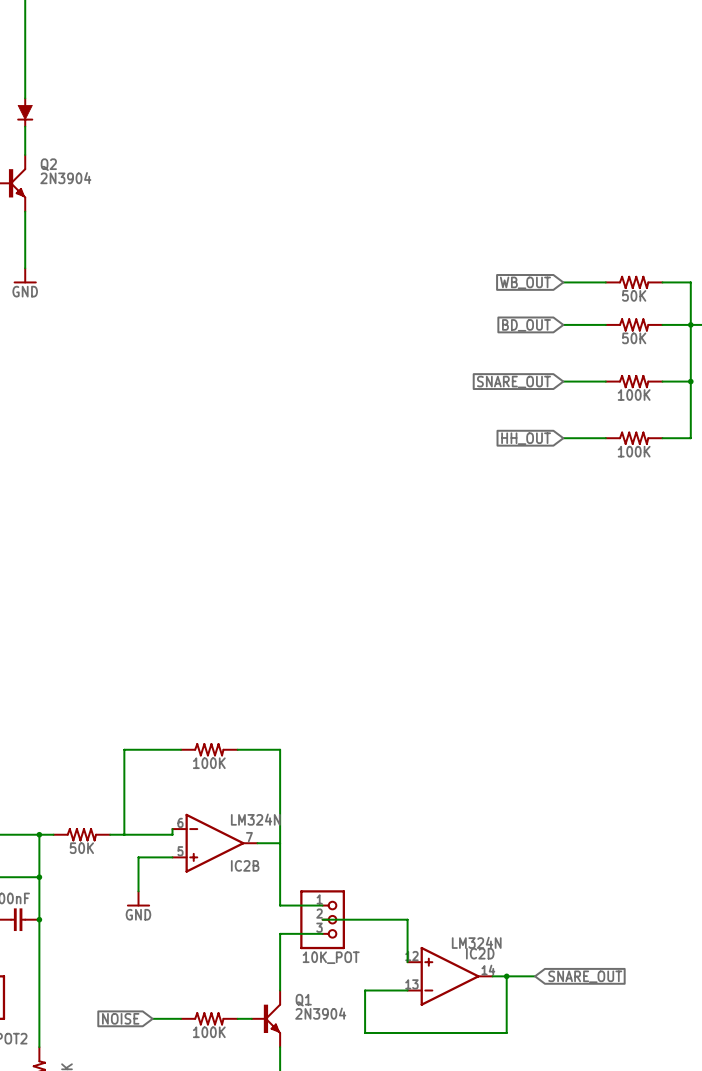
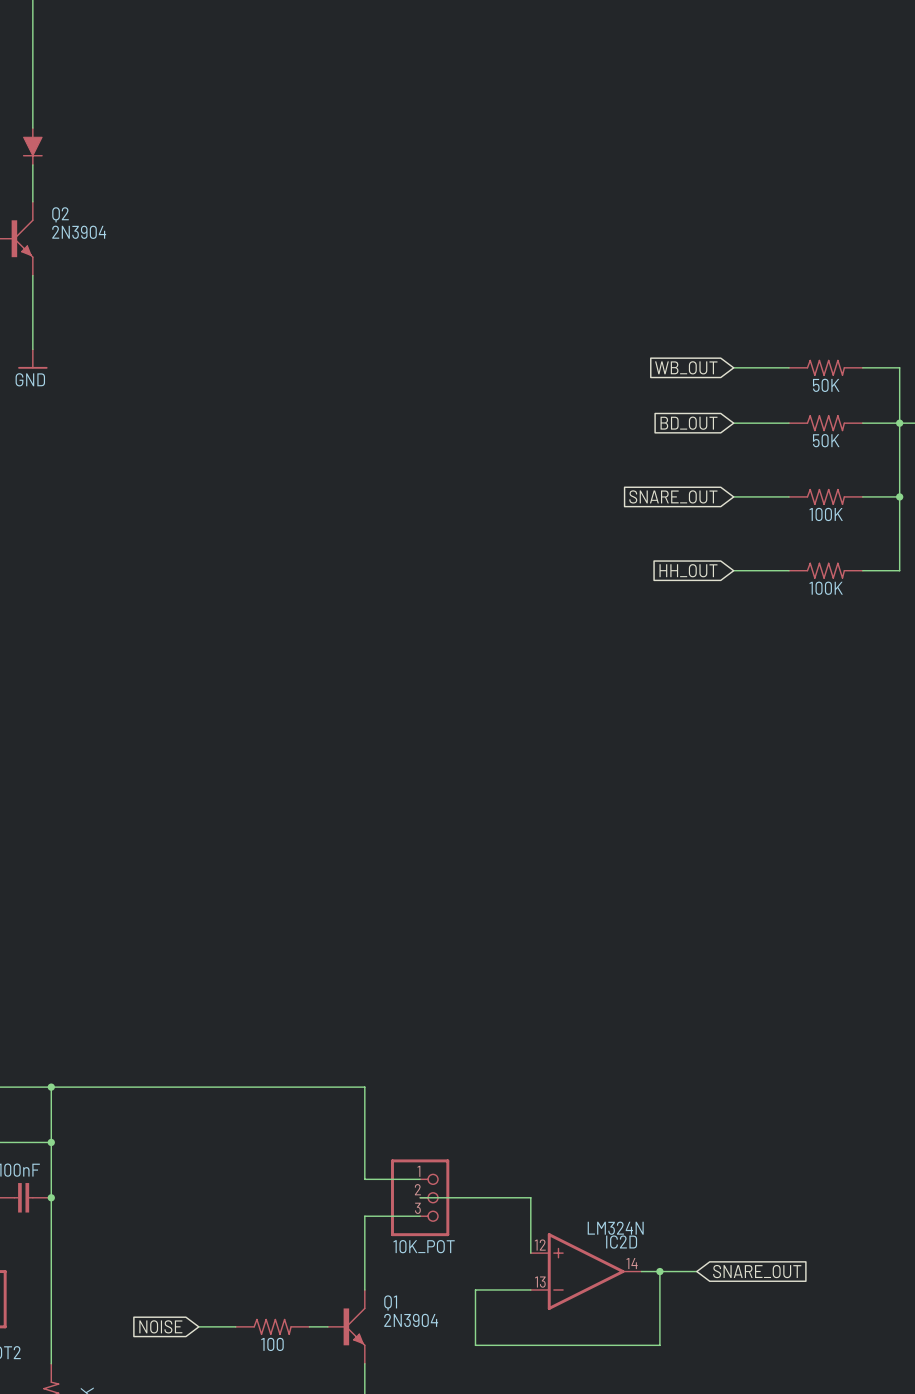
wire: (180, 749) (124, 749) (124, 834) -> none
part: 100K (209, 749) -> none
wire: (237, 749) (280, 749) (280, 834) -> (224, 1087) (364, 1087)
wire: (172, 829) (172, 834) -> none
part: 50K (81, 834) -> none
IC2B: LM324N (214, 843) -> none
wire: (257, 843) (280, 843) -> none
wire: (172, 857) (138, 857) (138, 891) -> none
power symbol: GND (138, 898) -> none
part value: 100K (209, 1032) -> 100 (272, 1344)

